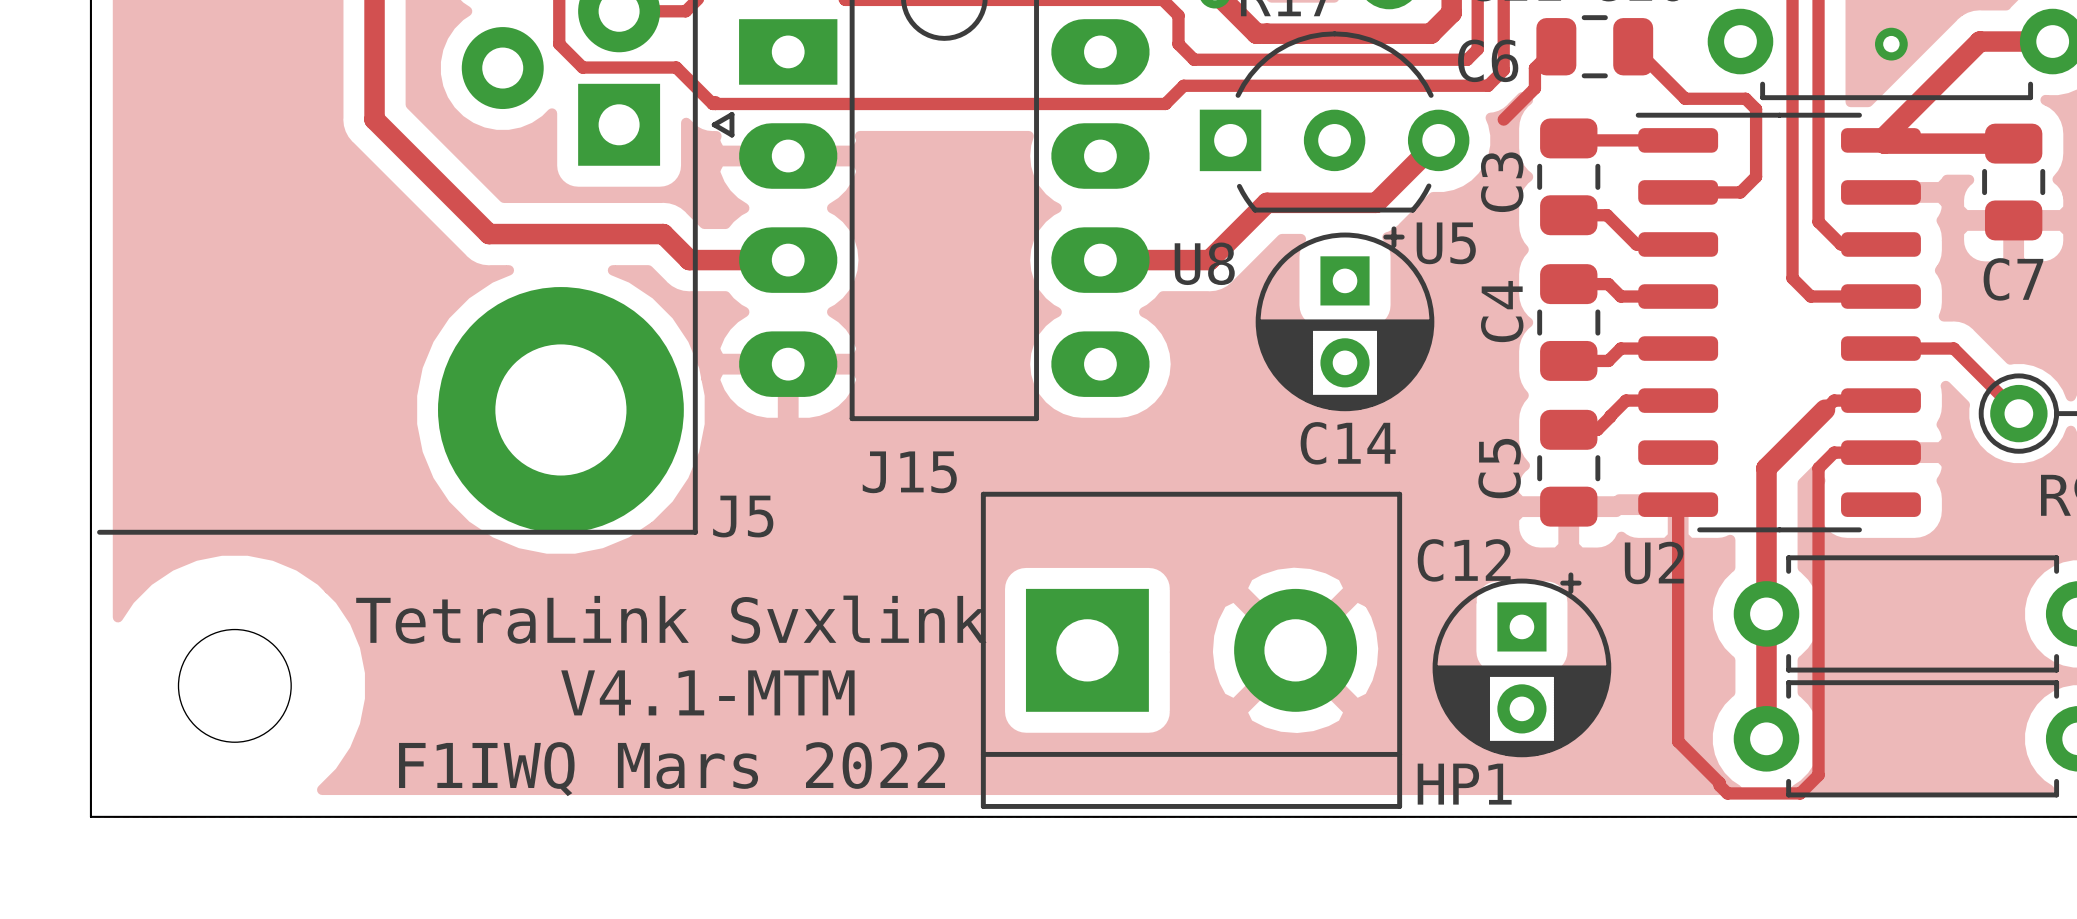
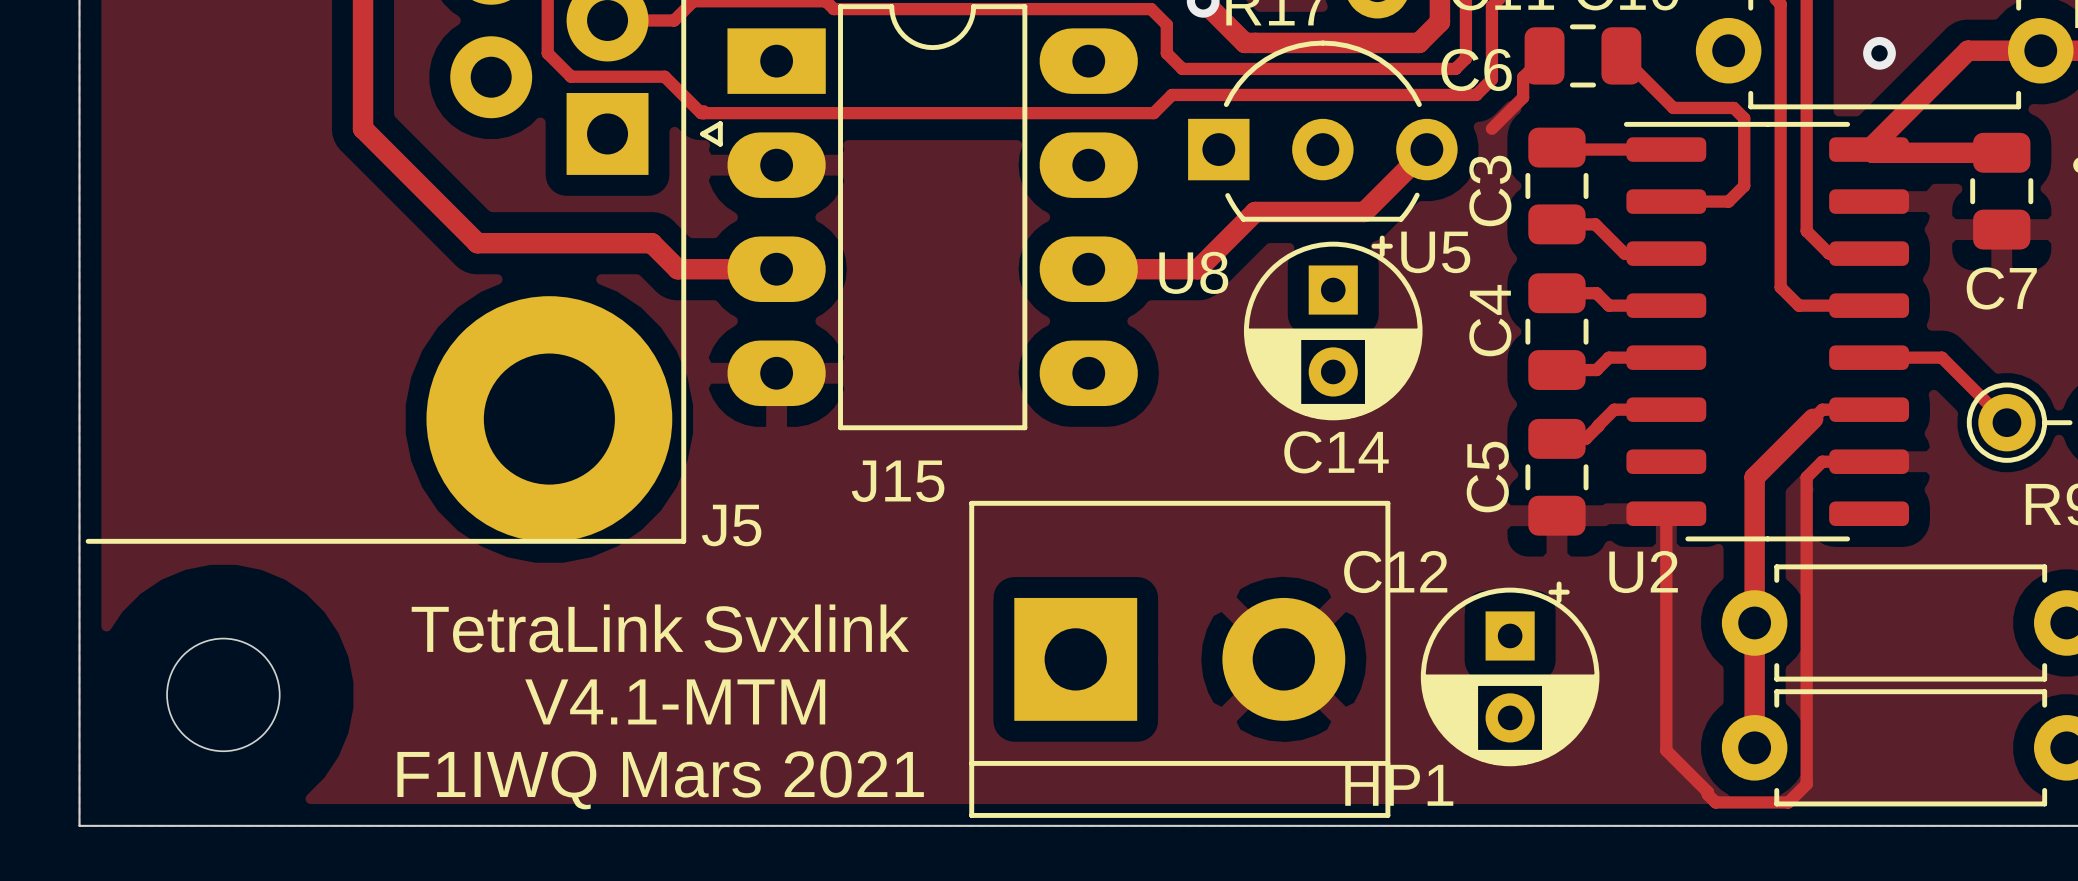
C12 name position: C12 (1464, 560) -> C12 (1395, 572)
text: F1IWQ Mars 2022 (672, 769) -> F1IWQ Mars 2021 (660, 780)
text position: HP1 (1464, 784) -> HP1 (1399, 785)

